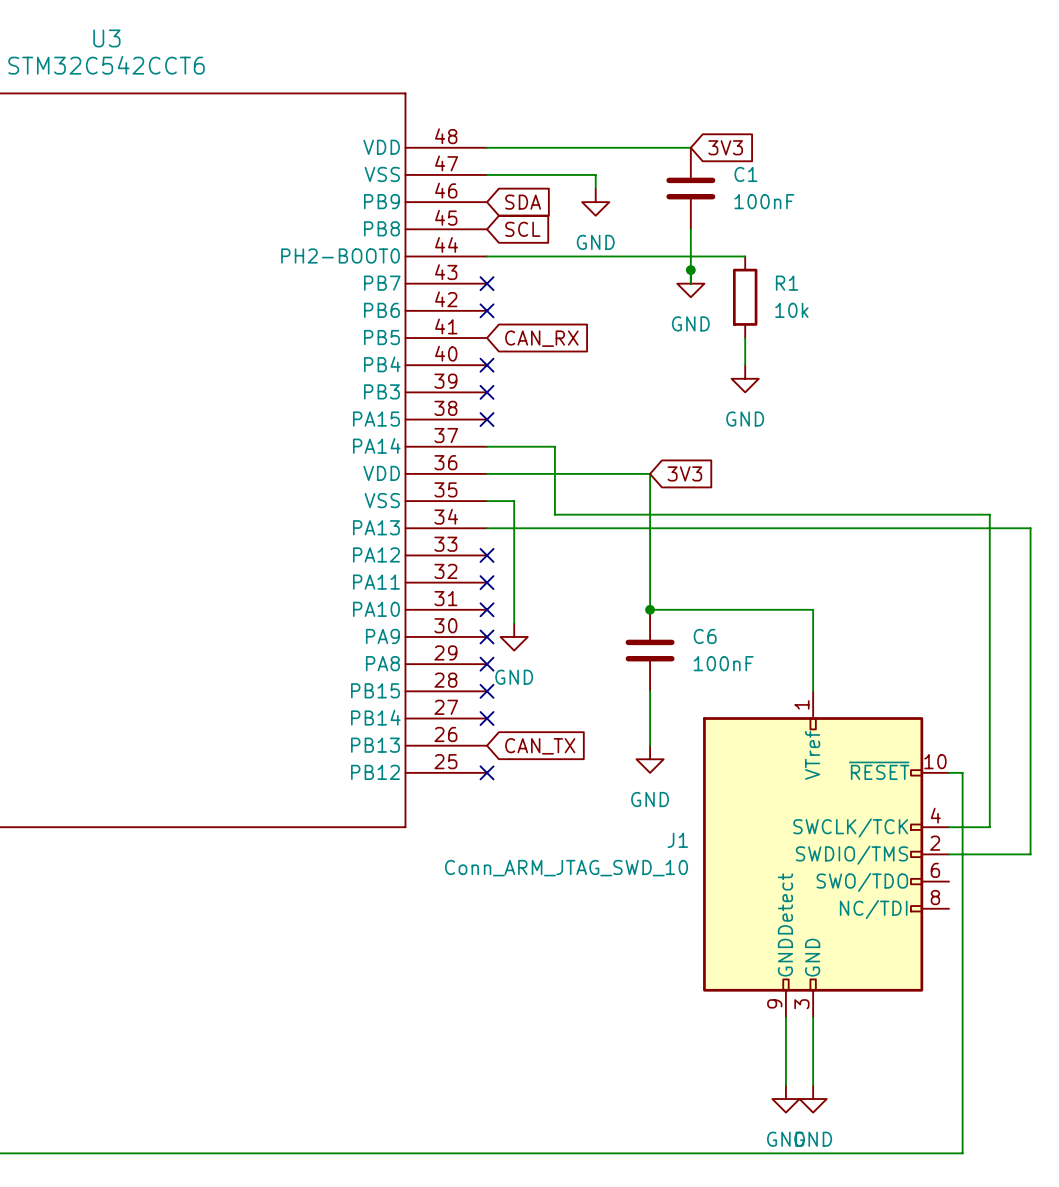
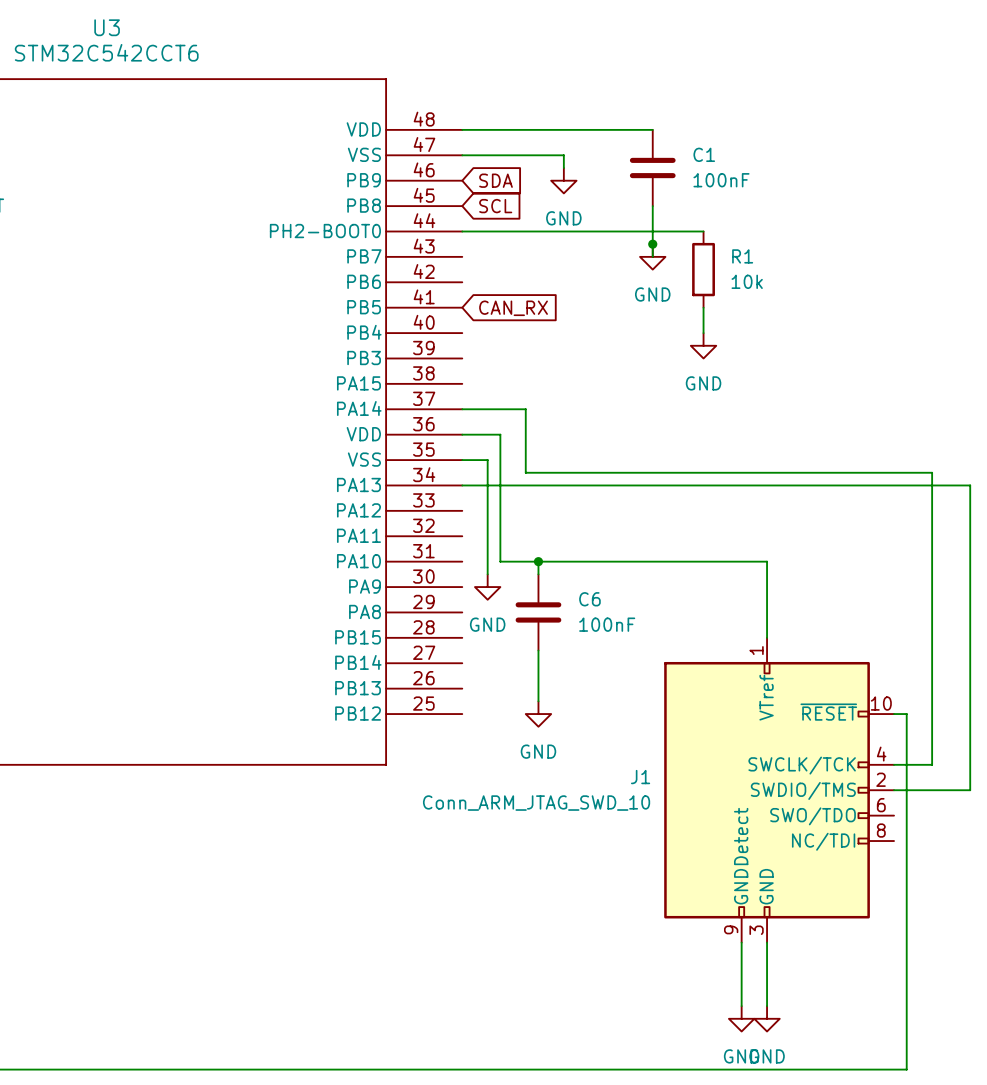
global label: 3V3 (725, 147) -> none
no-connect mark: (487, 283) -> none
no-connect mark: (487, 310) -> none
no-connect mark: (487, 365) -> none
no-connect mark: (487, 392) -> none
no-connect mark: (487, 419) -> none
wire: (527, 473) (650, 473) (650, 609) -> (500, 434) (500, 561) (614, 561)
global label: 3V3 (684, 473) -> none
no-connect mark: (487, 555) -> none
no-connect mark: (487, 582) -> none
no-connect mark: (487, 609) -> none
wire: none -> (538, 561) (538, 574)
junction: none -> (538, 561)
junction: (650, 609) -> none
no-connect mark: (487, 636) -> none
C6 position: (650, 650) -> (538, 612)
no-connect mark: (487, 664) -> none
no-connect mark: (487, 691) -> none
wire: (650, 691) (650, 745) -> (538, 650) (538, 701)
no-connect mark: (487, 718) -> none
global label: CAN_TX (540, 746) -> none
power symbol position: GND (650, 759) -> GND (538, 714)
no-connect mark: (487, 772) -> none

